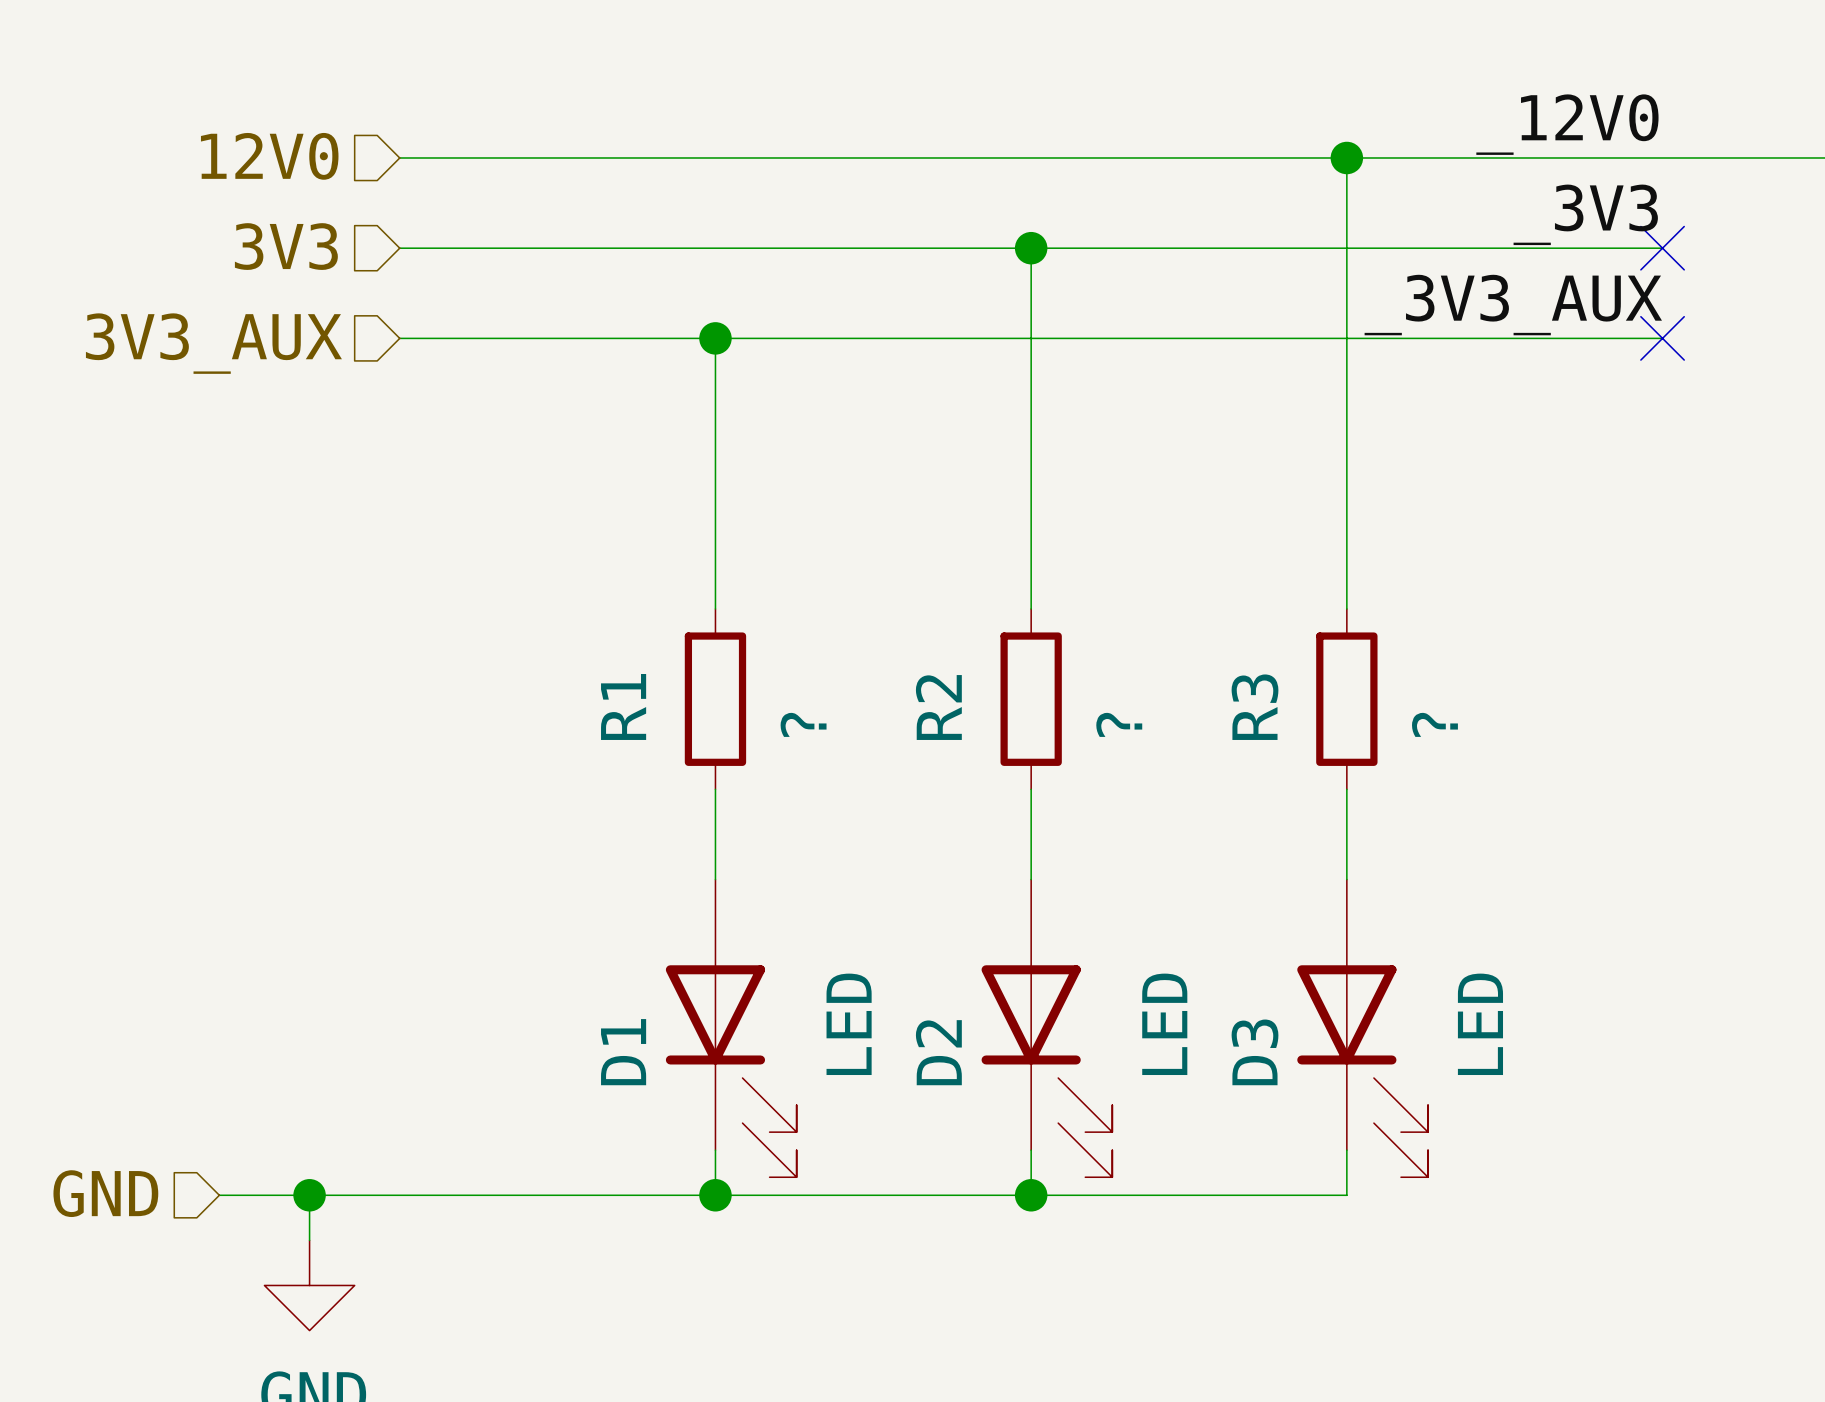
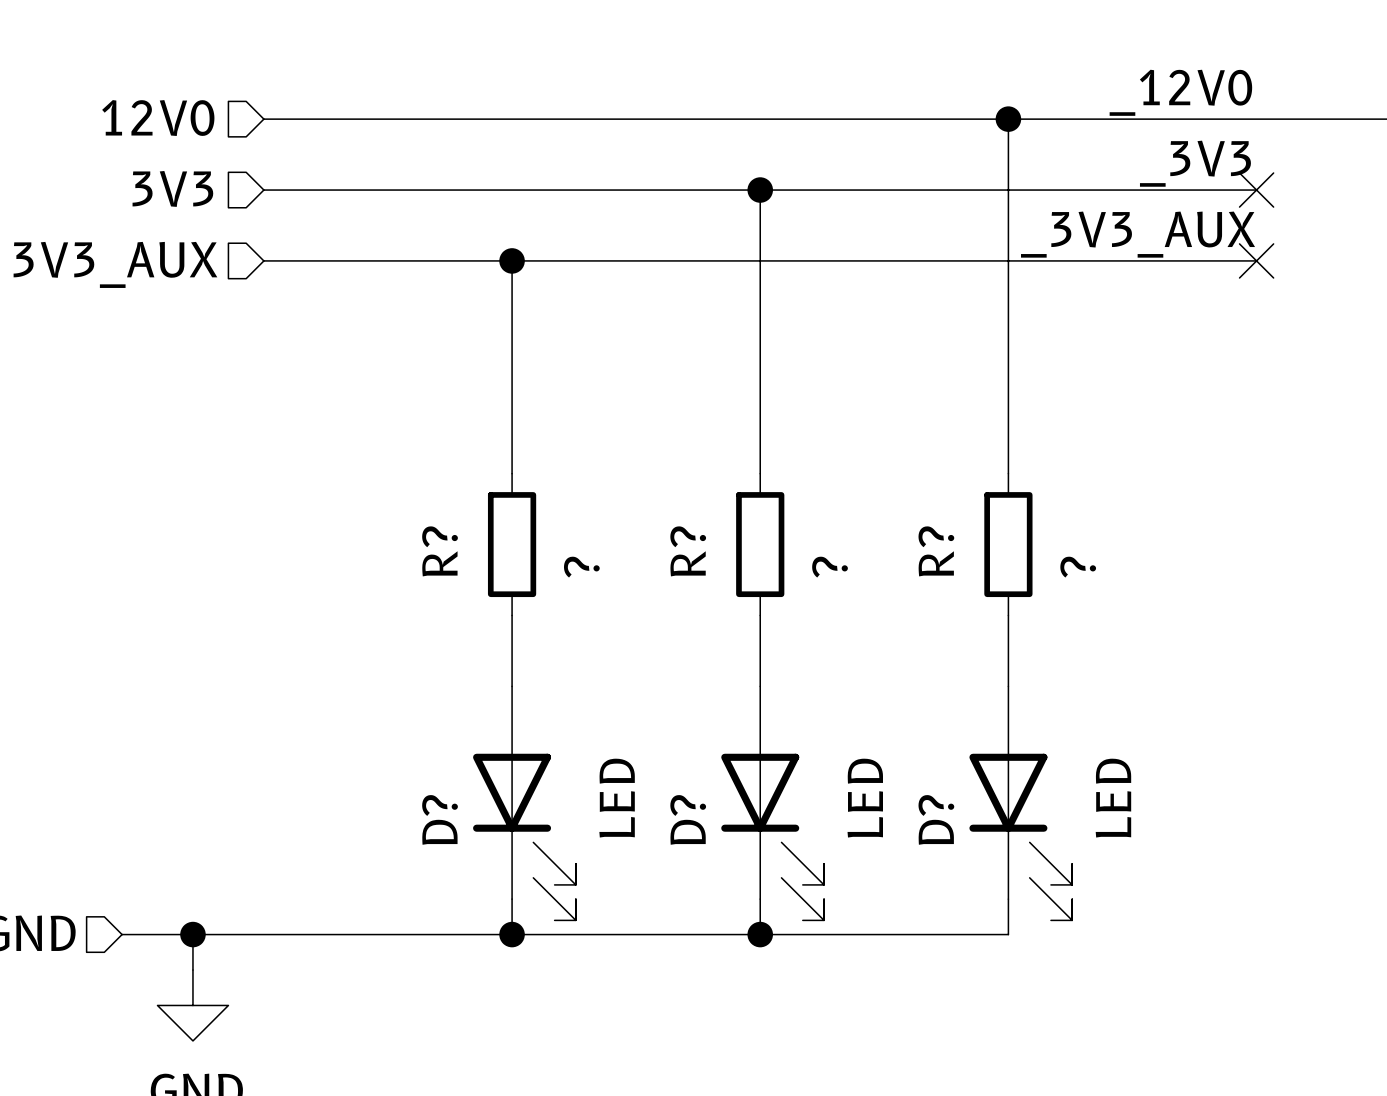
R1 name: R1 (623, 706) -> R? (440, 551)
R2 name: R2 (938, 707) -> R? (688, 551)
R3 name: R3 (1255, 707) -> R? (936, 551)
D1 name: D1 (623, 1052) -> D? (440, 819)
D2 name: D2 (938, 1052) -> D? (688, 819)
D3 name: D3 (1255, 1052) -> D? (936, 819)

